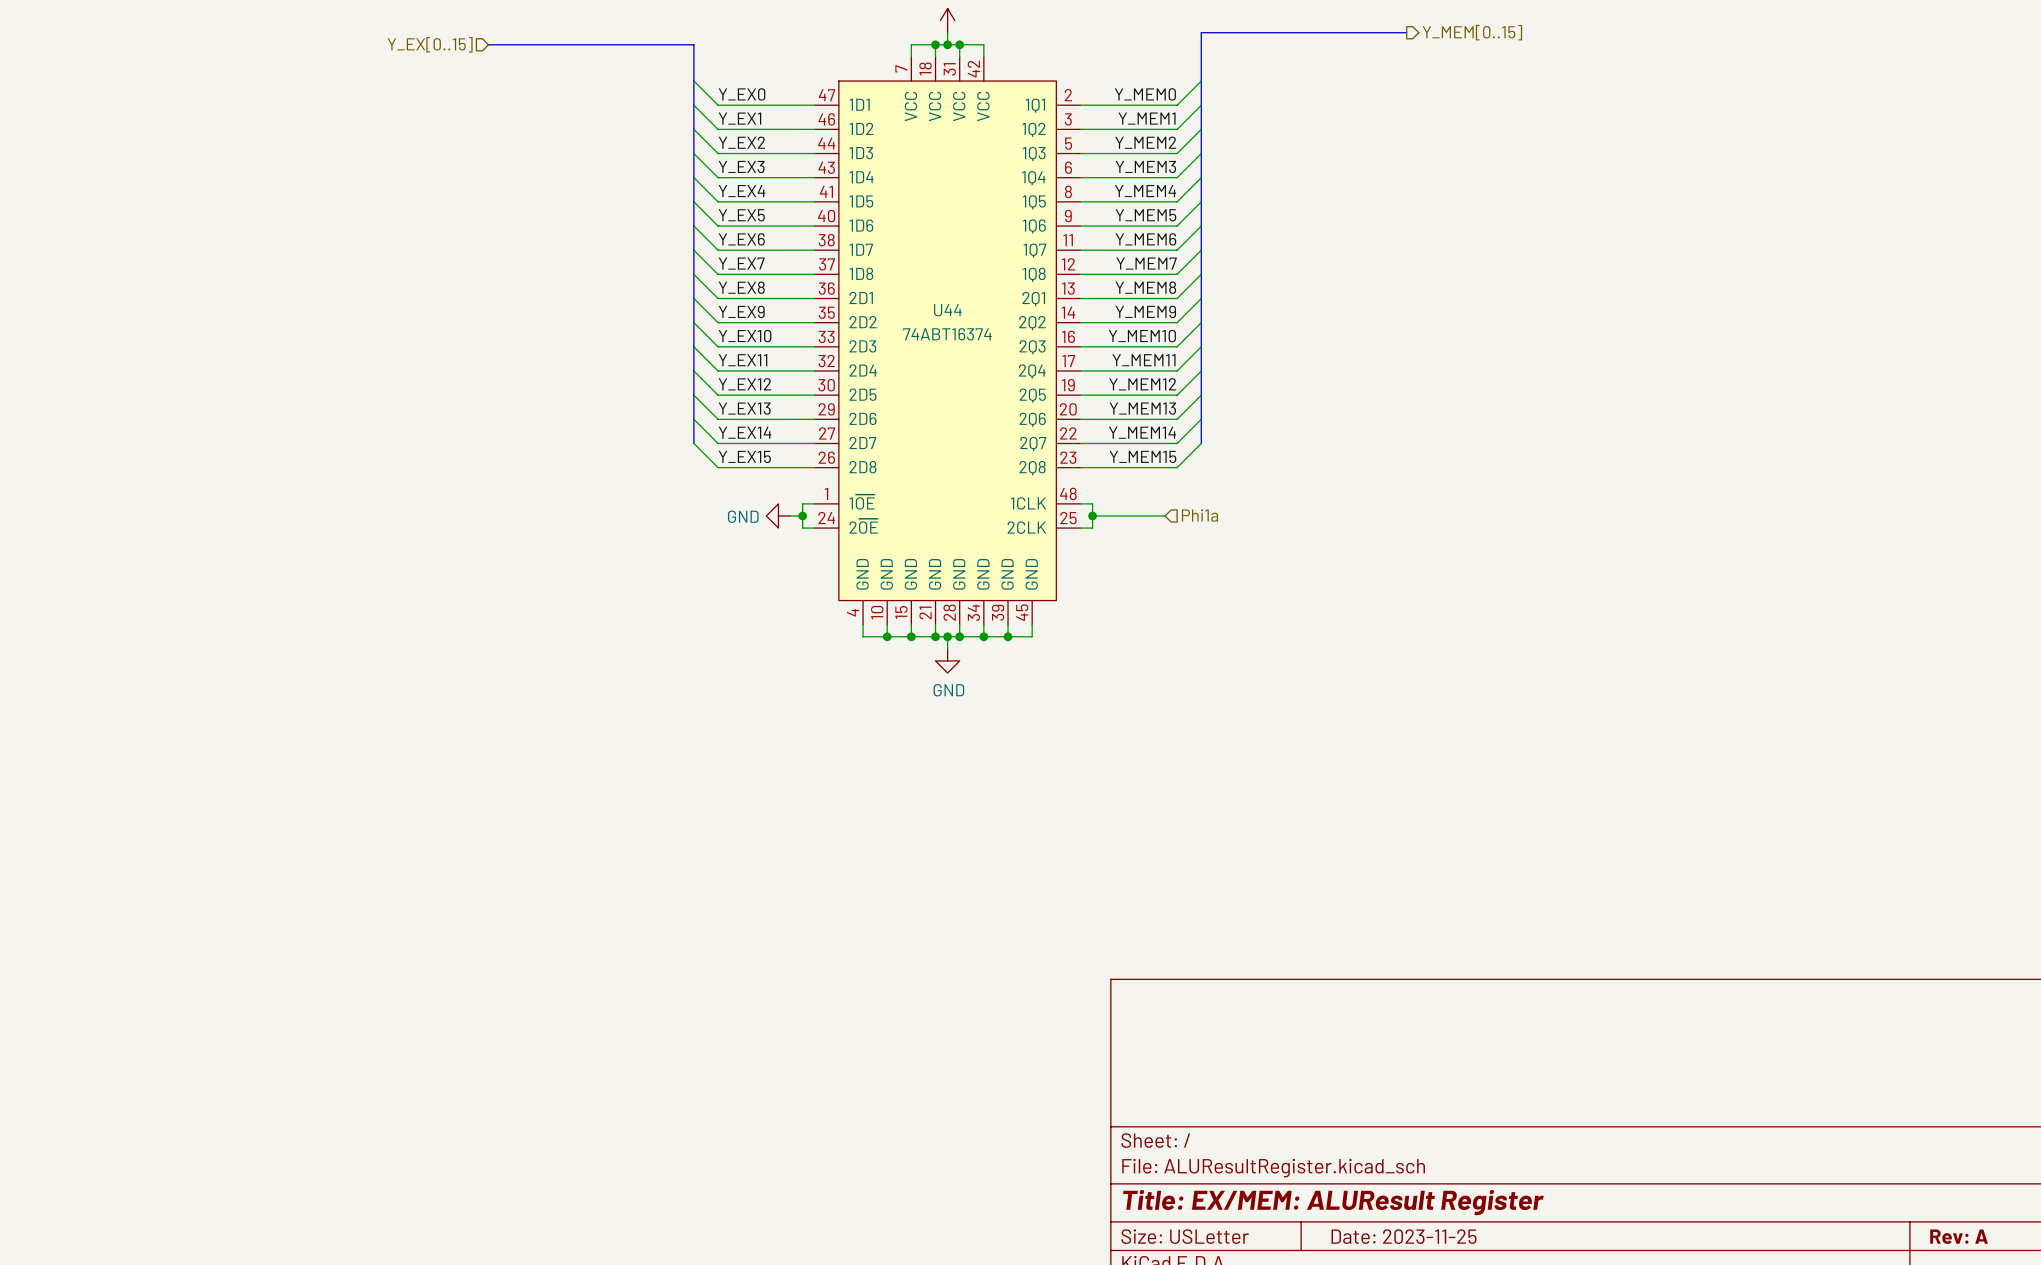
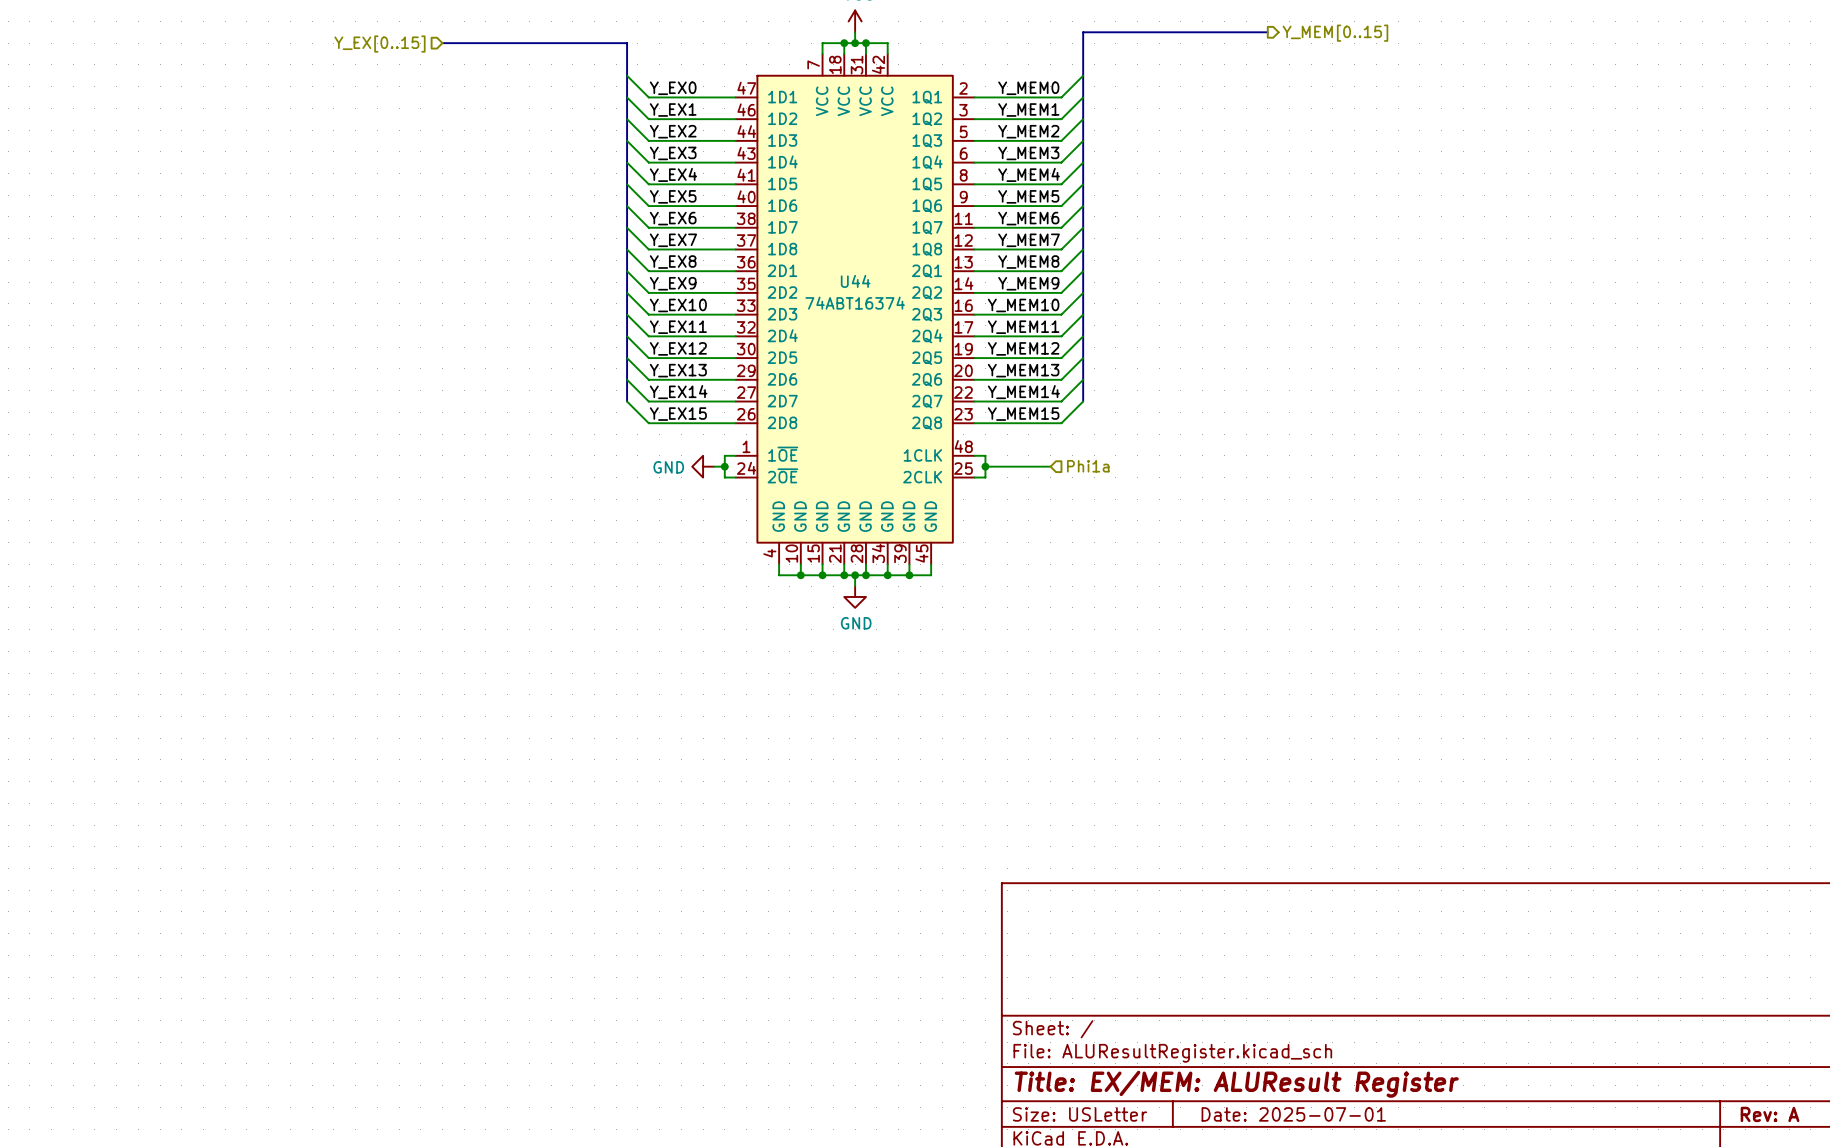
title block: Date: 2023-11-25 (1404, 1236) -> Date: 2025-07-01 (1293, 1114)

